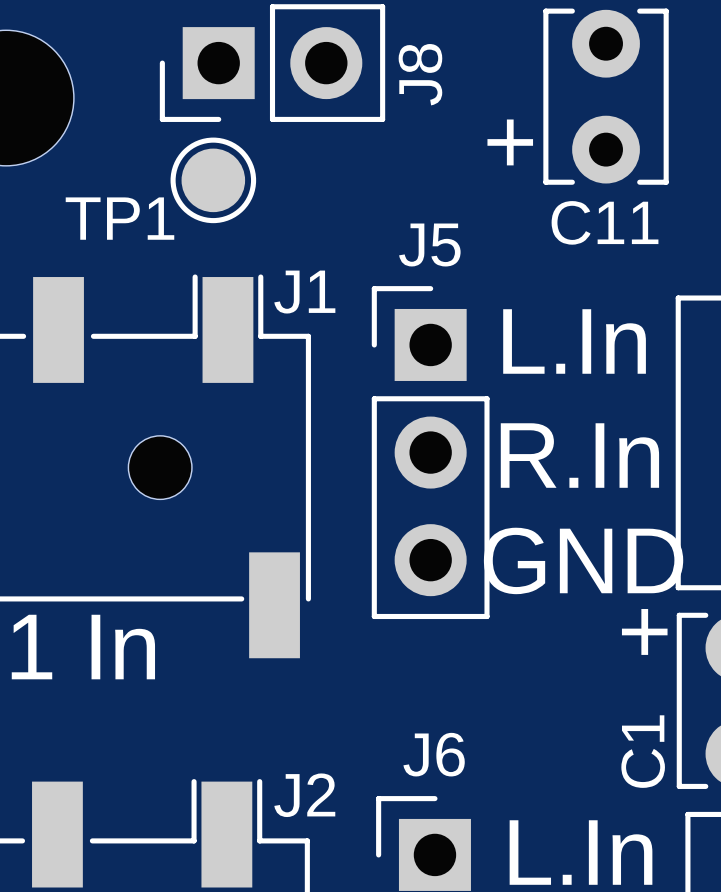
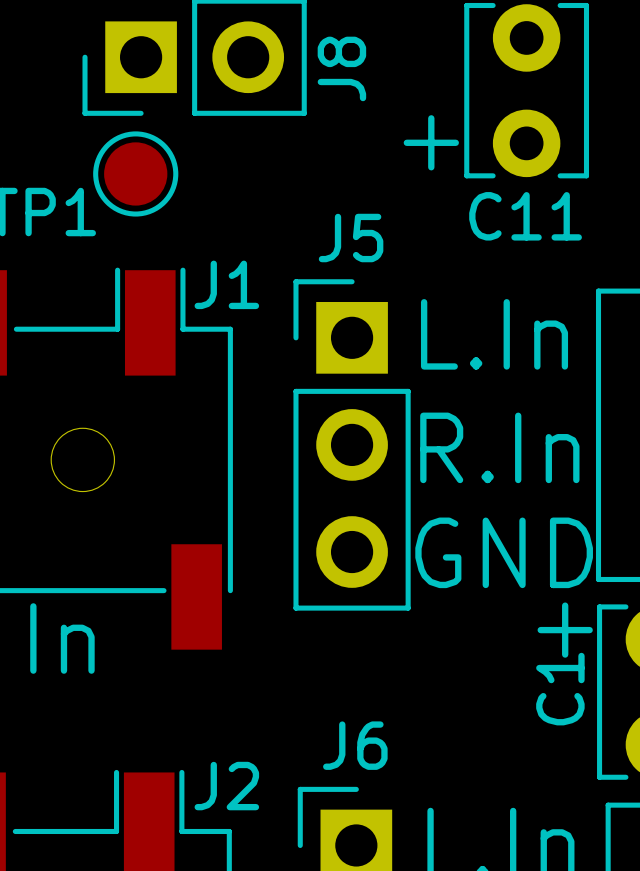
C1 name position: C1 (643, 751) -> C1 (560, 689)

